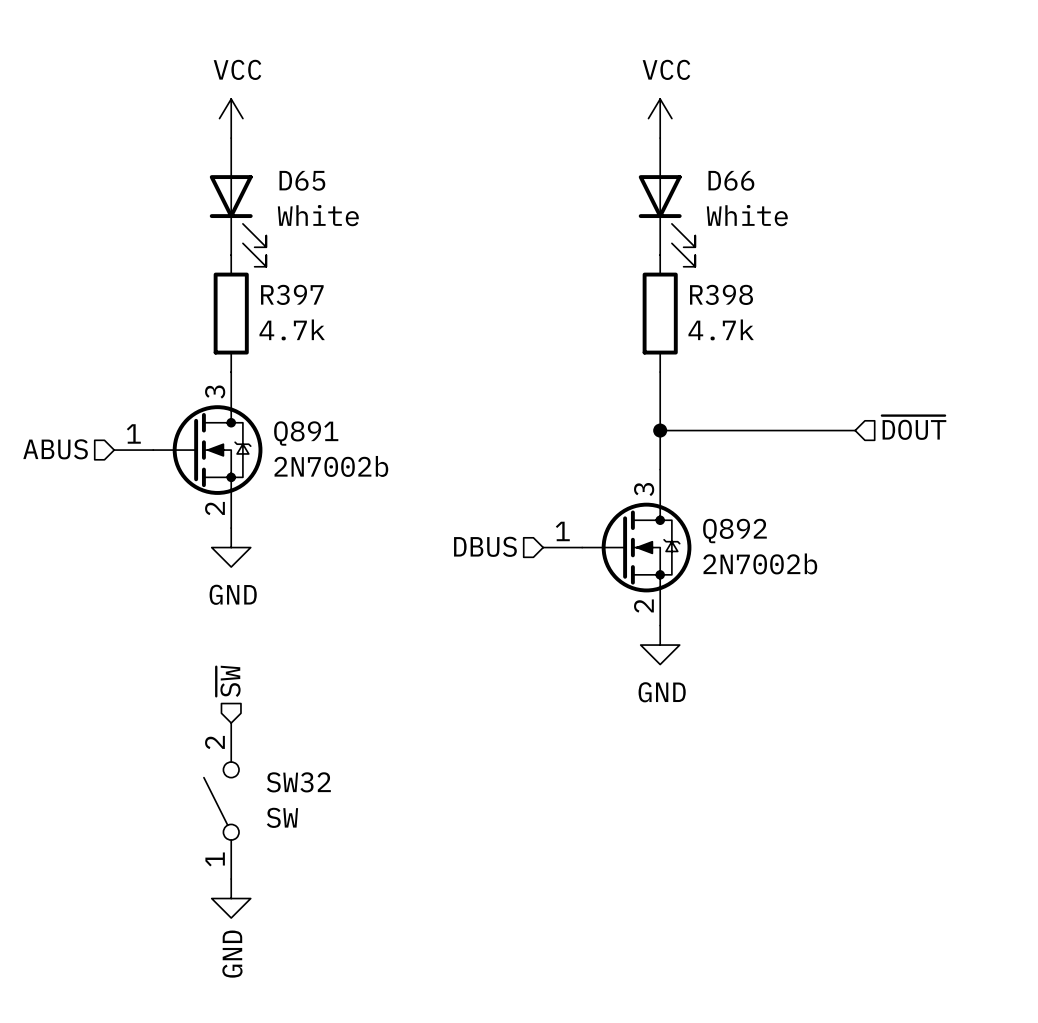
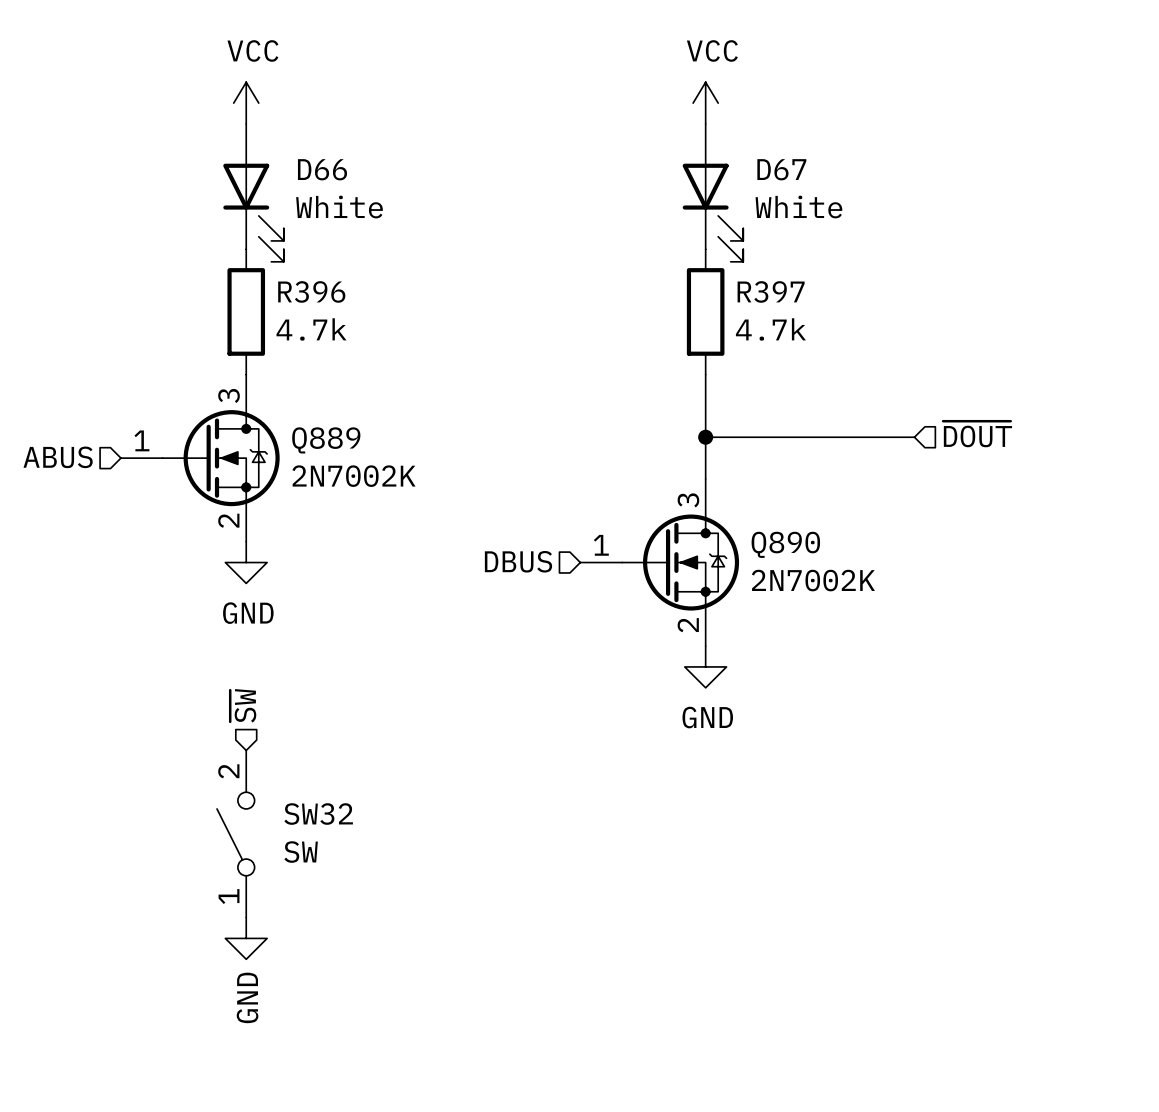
D65 name: D65 (302, 180) -> D66 (322, 169)
D66 name: D66 (731, 180) -> D67 (781, 169)
R397 name: R397 (292, 294) -> R396 (311, 291)
R398 name: R398 (721, 294) -> R397 (771, 291)
Q891 name: Q891 (306, 433) -> Q889 (326, 440)
Q891 value: 2N7002b (331, 466) -> 2N7002K (353, 476)
Q892 name: Q892 (734, 531) -> Q890 (785, 544)
Q892 value: 2N7002b (760, 563) -> 2N7002K (813, 580)

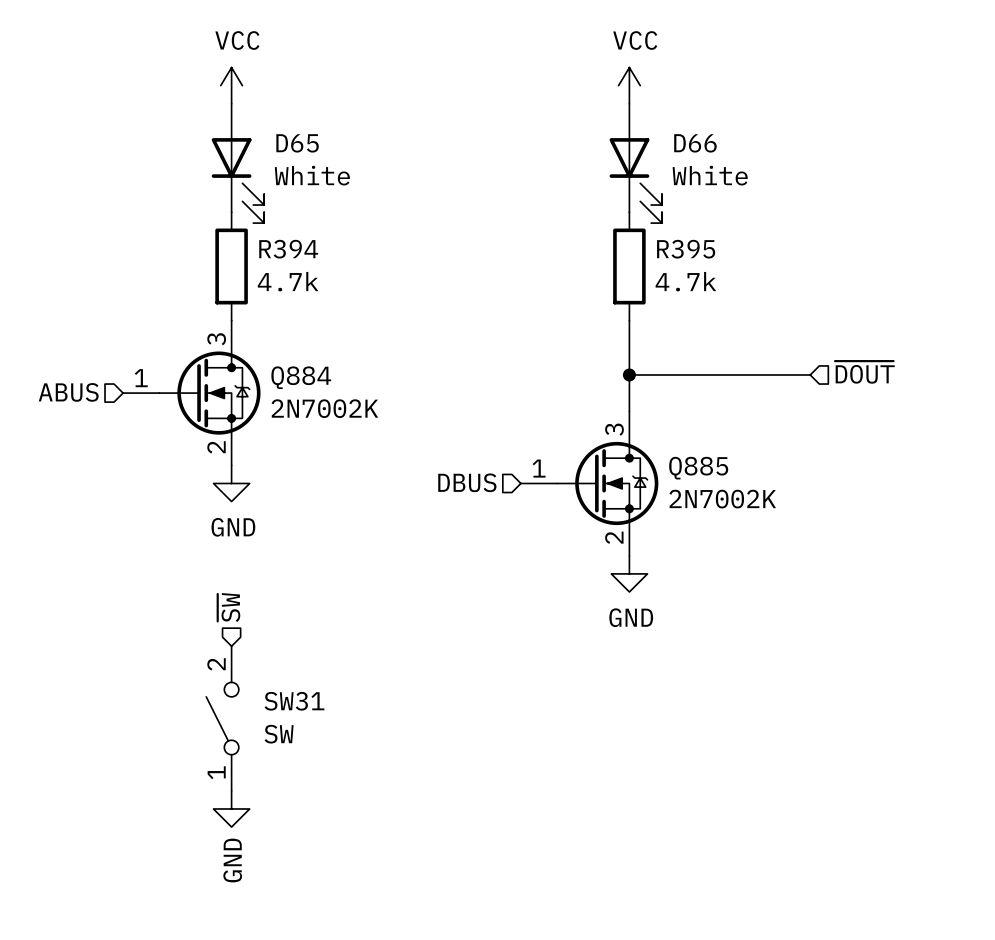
D66 name: D66 (322, 169) -> D65 (297, 143)
D67 name: D67 (781, 169) -> D66 (695, 143)
R396 name: R396 (311, 291) -> R394 (288, 249)
R397 name: R397 (771, 291) -> R395 (686, 249)
Q889 name: Q889 (326, 440) -> Q884 (301, 377)
Q890 name: Q890 (785, 544) -> Q885 (698, 468)
SW32 name: SW32 (318, 814) -> SW31 (294, 701)

